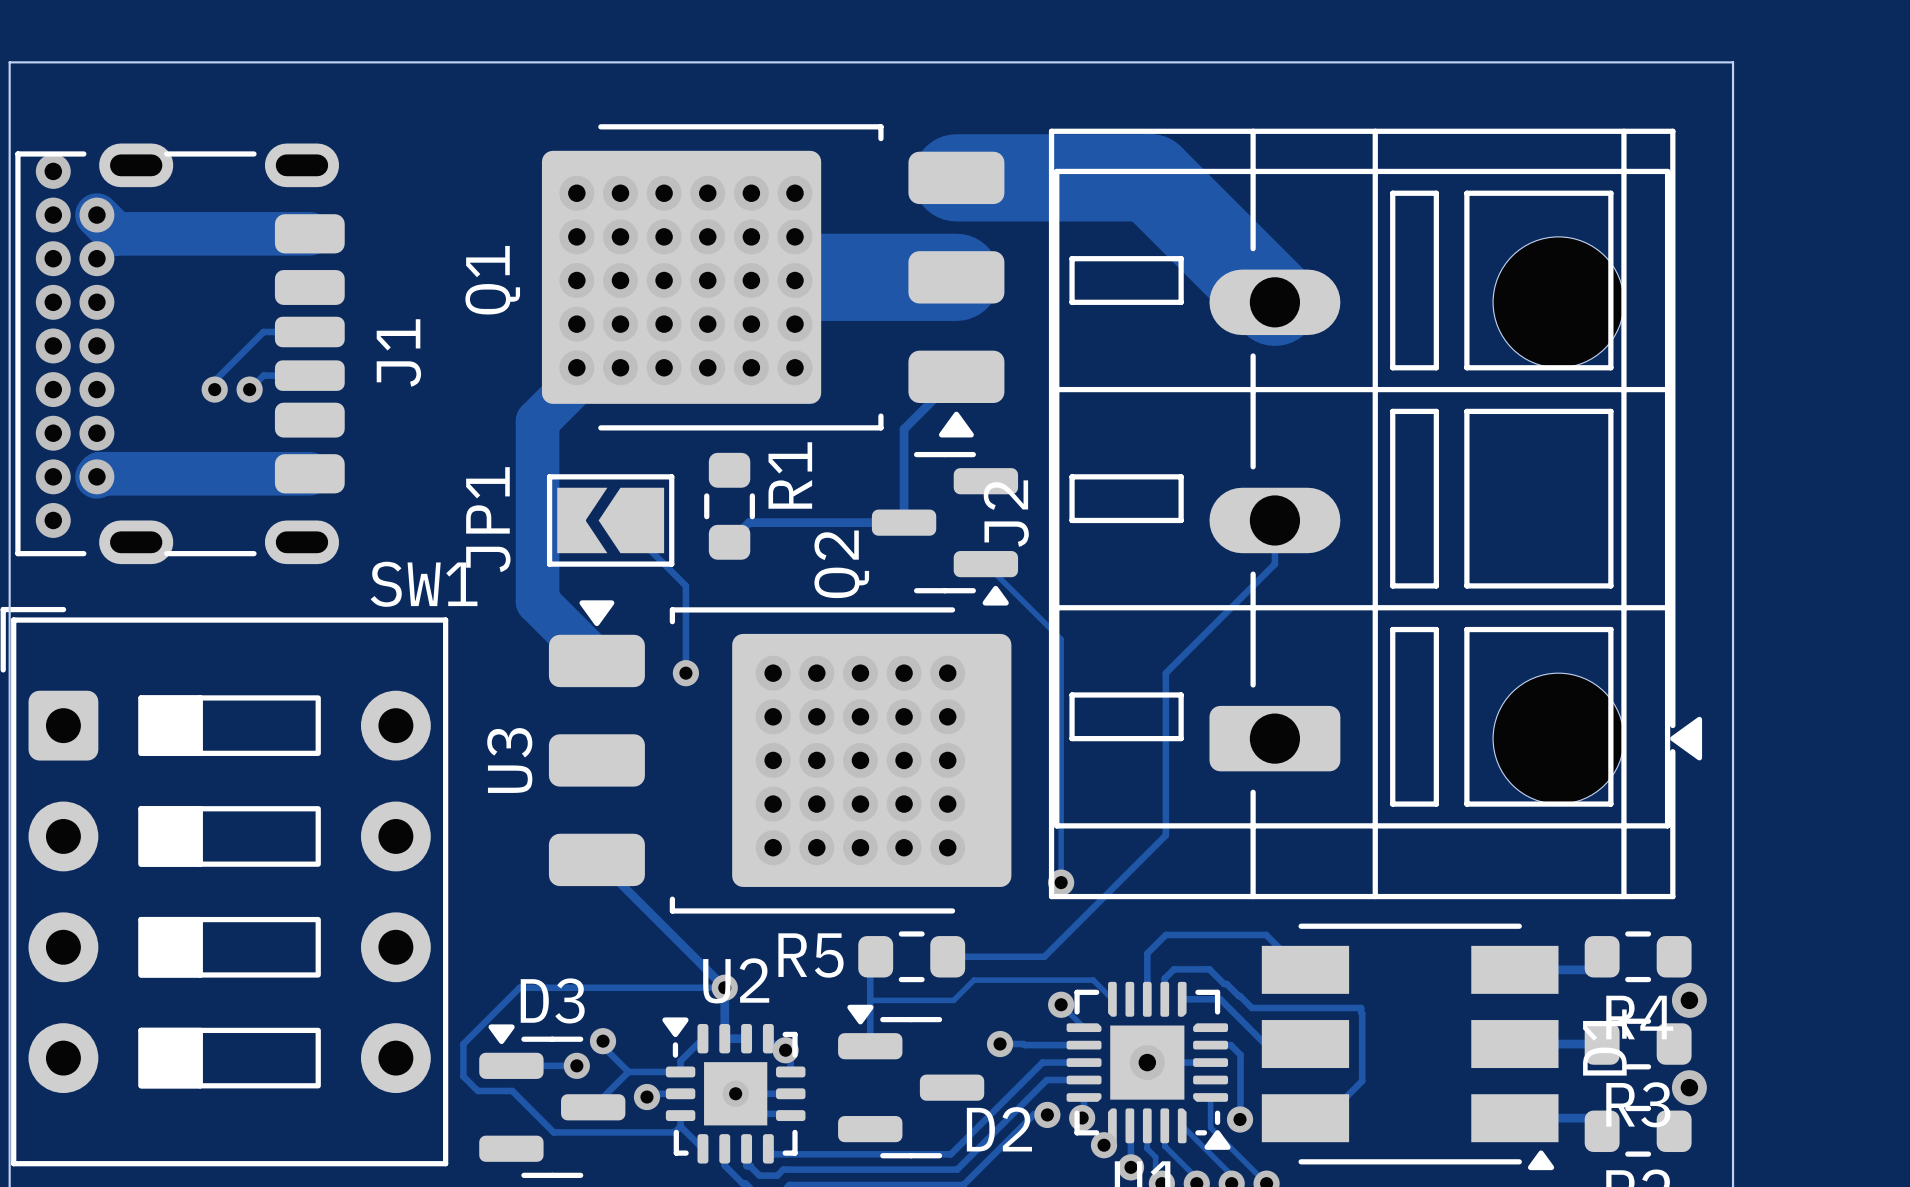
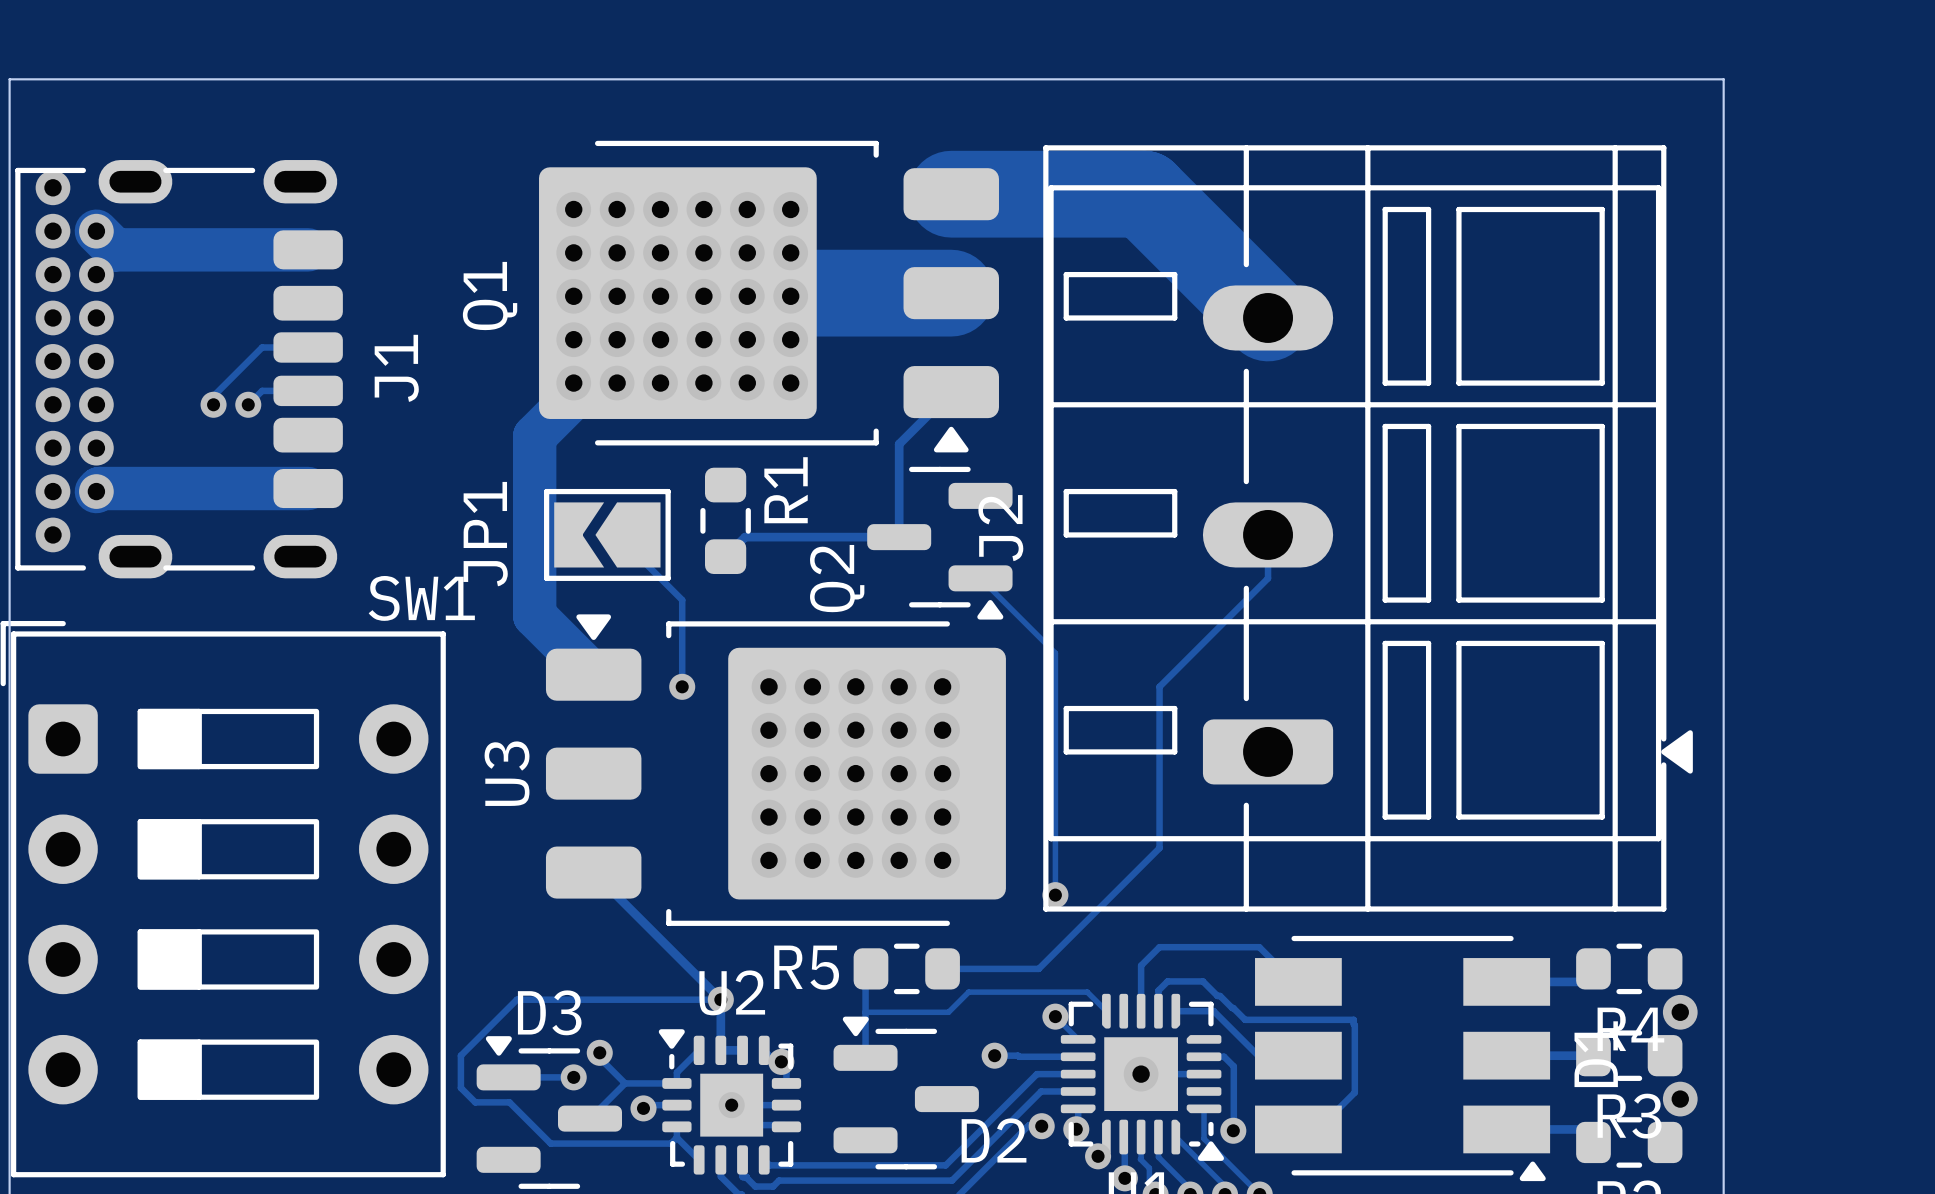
part: (1558, 302) -> none
part: (1558, 738) -> none

